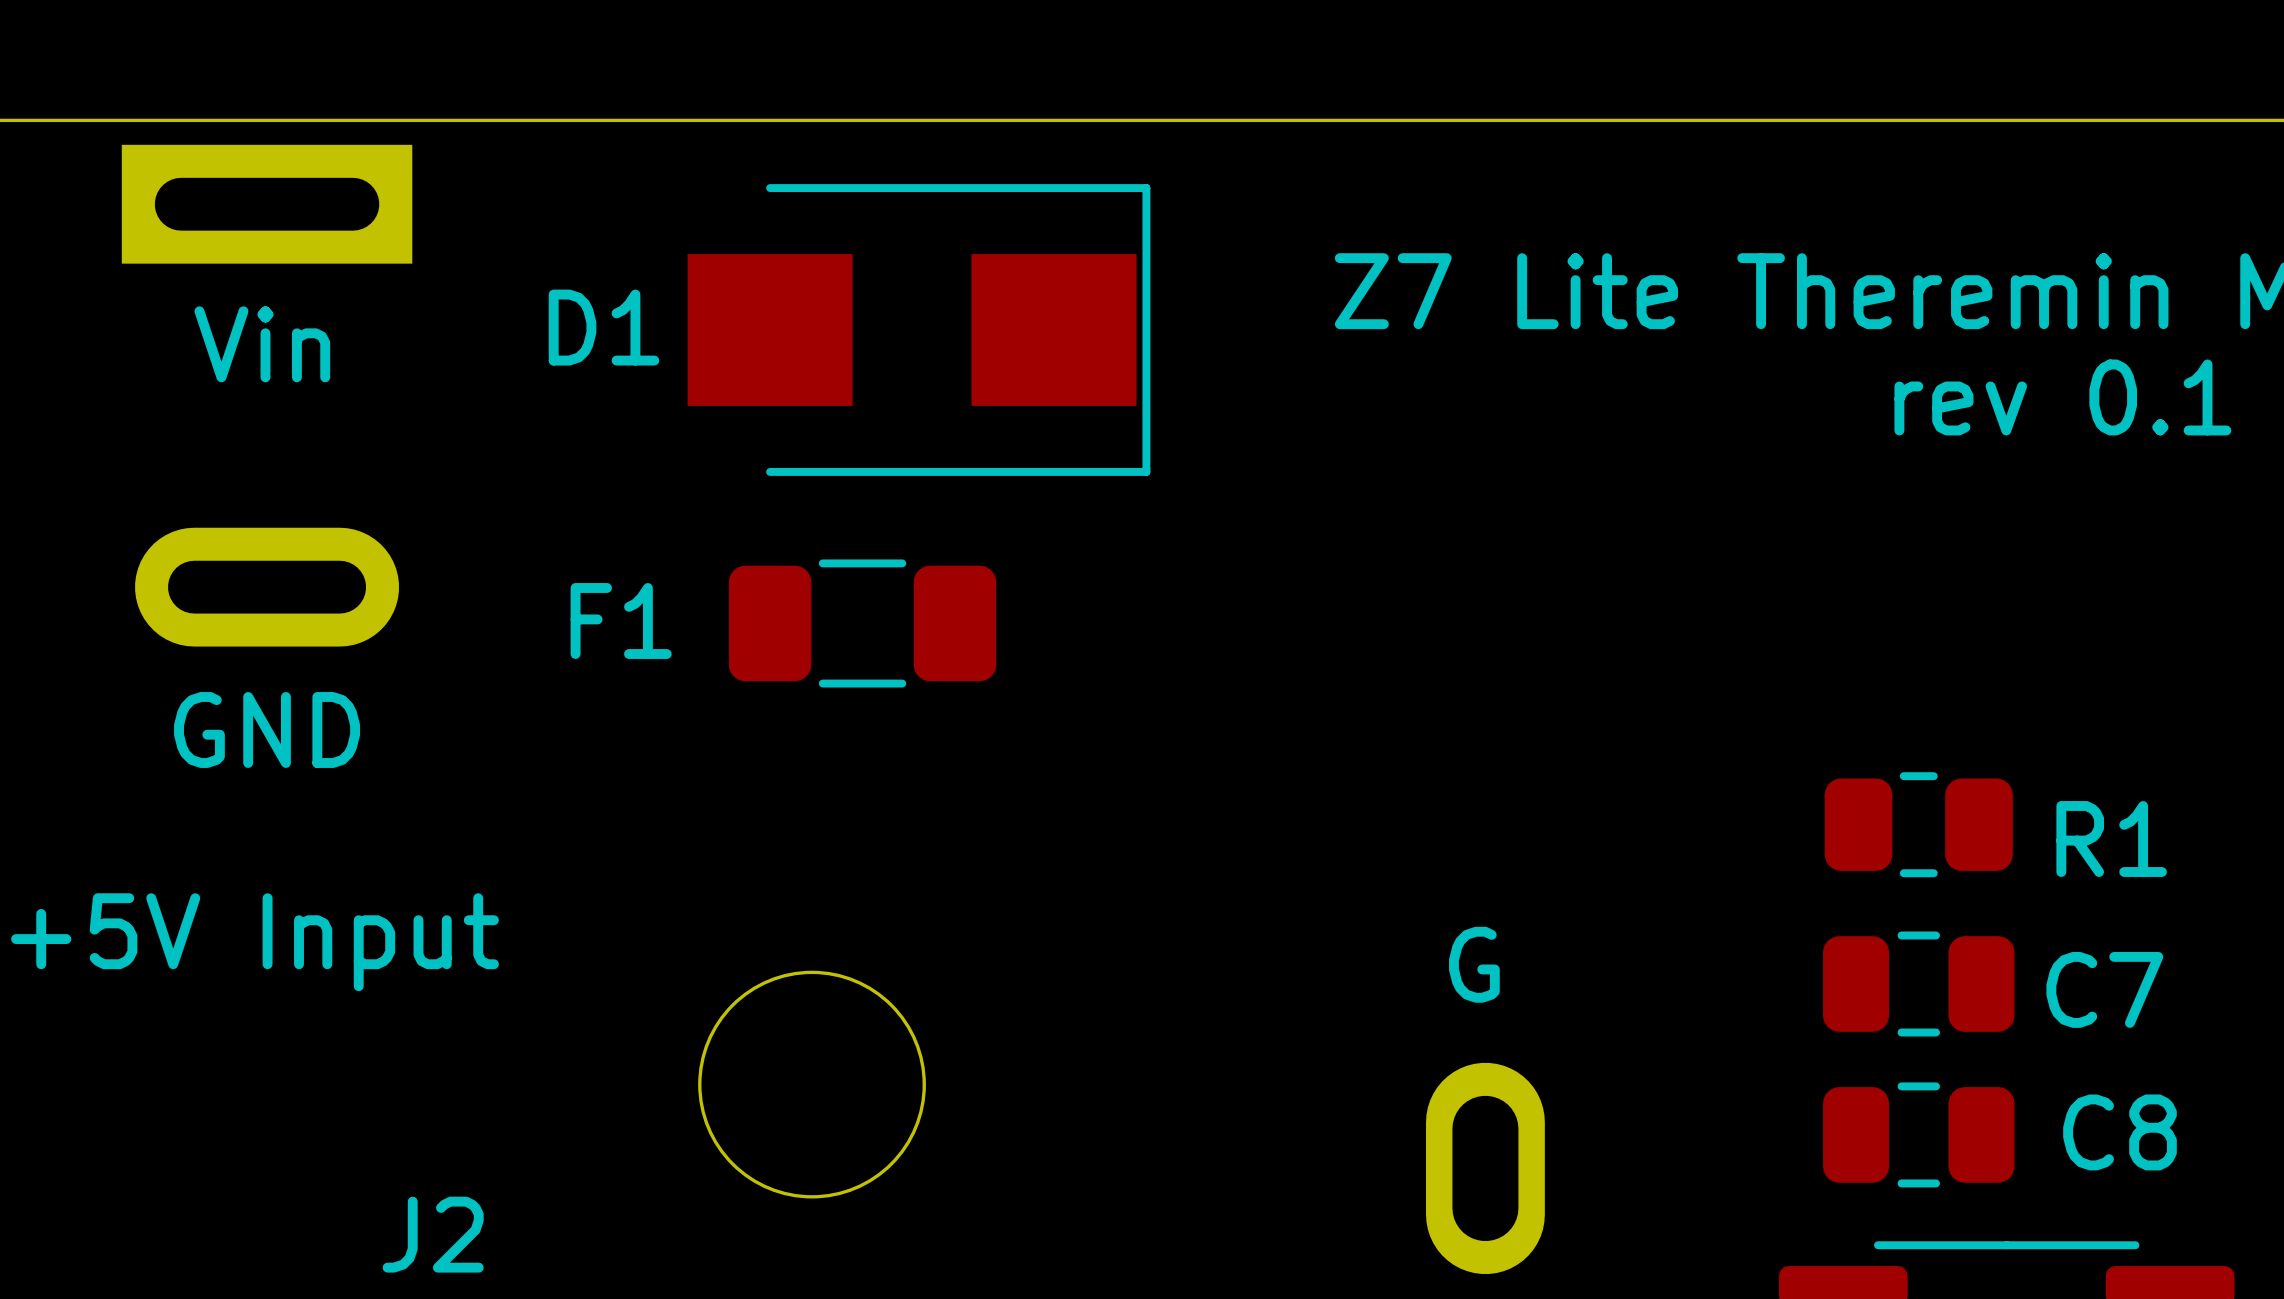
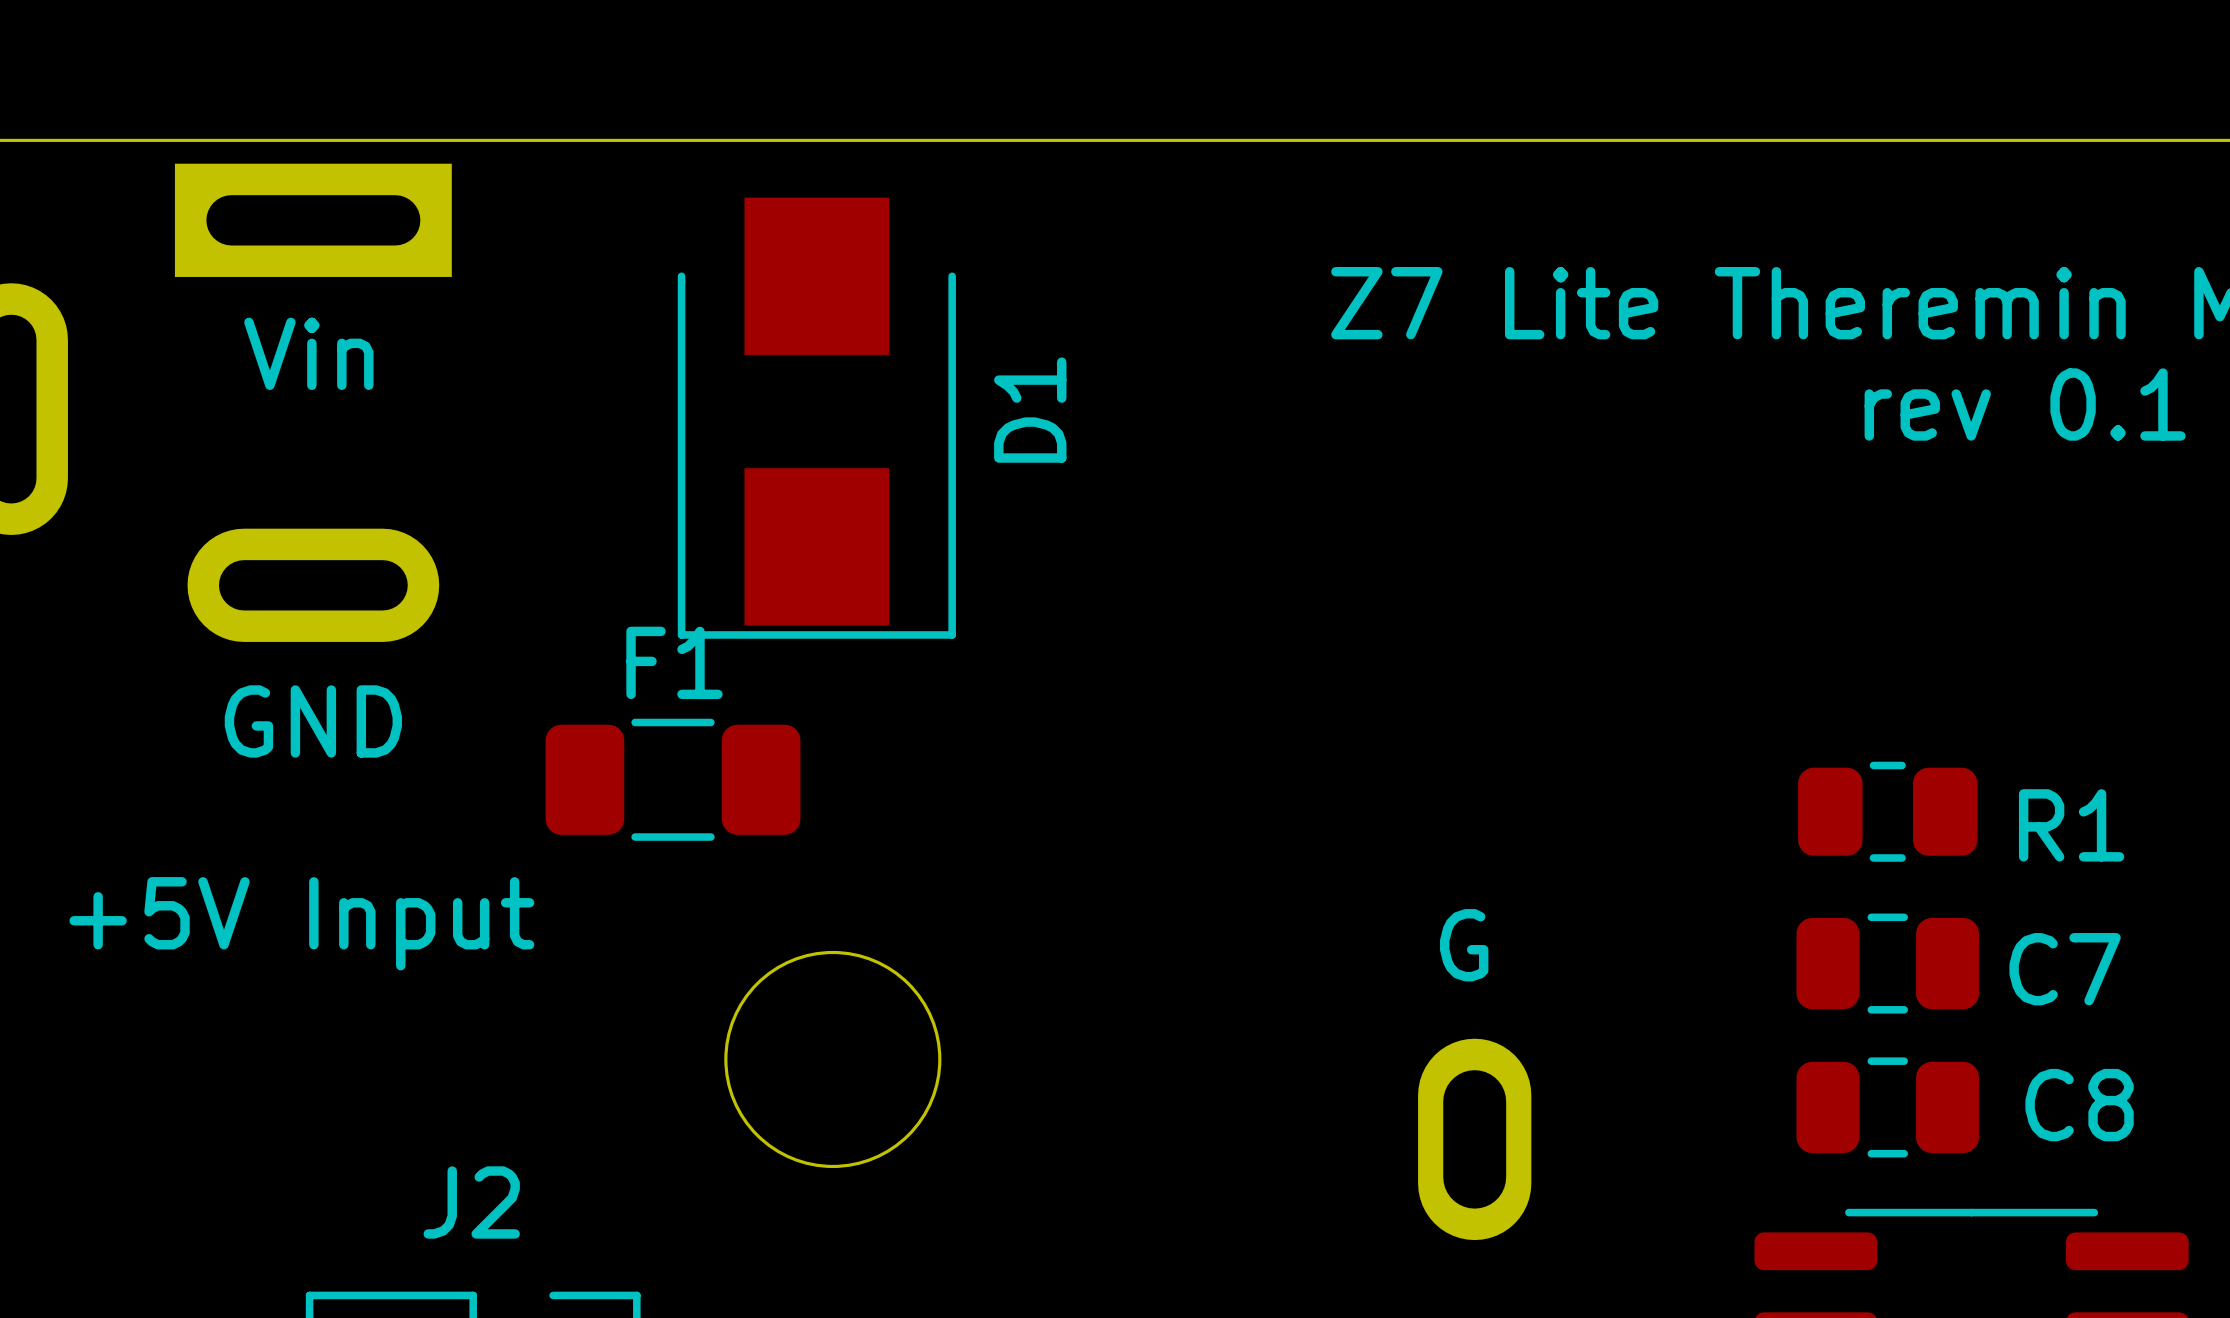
D1 name position: D1 (603, 327) -> D1 (1030, 410)
D1 rotation: 0° (918, 330) -> 90° clockwise (816, 418)
F1 name position: F1 (621, 620) -> F1 (674, 662)
F1 position: (862, 623) -> (673, 779)

